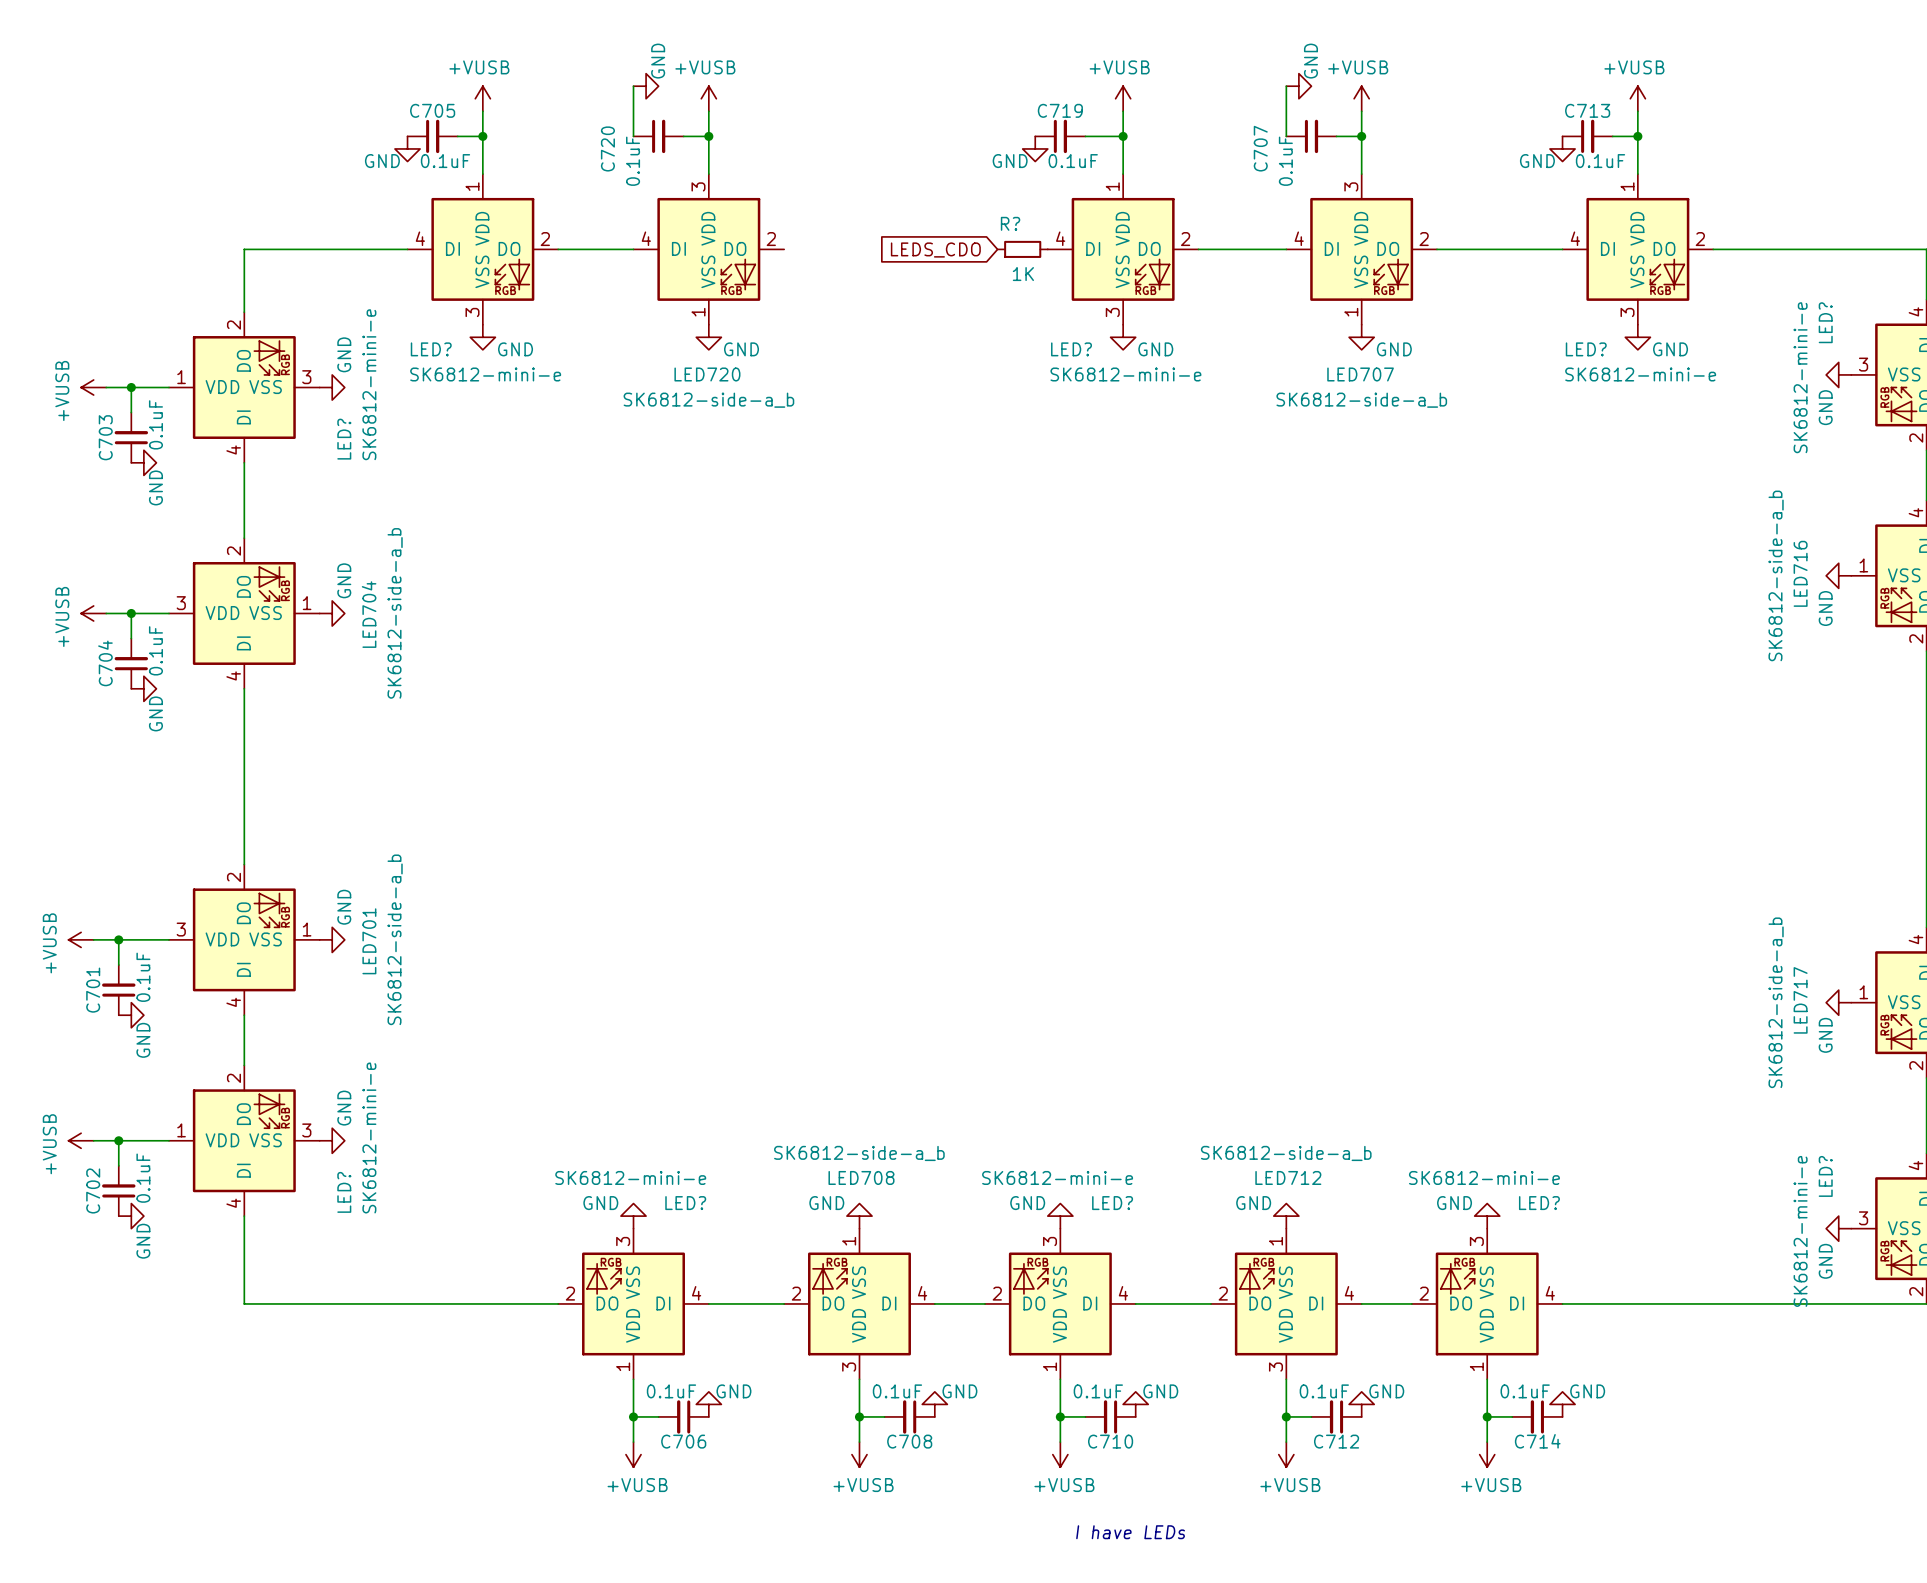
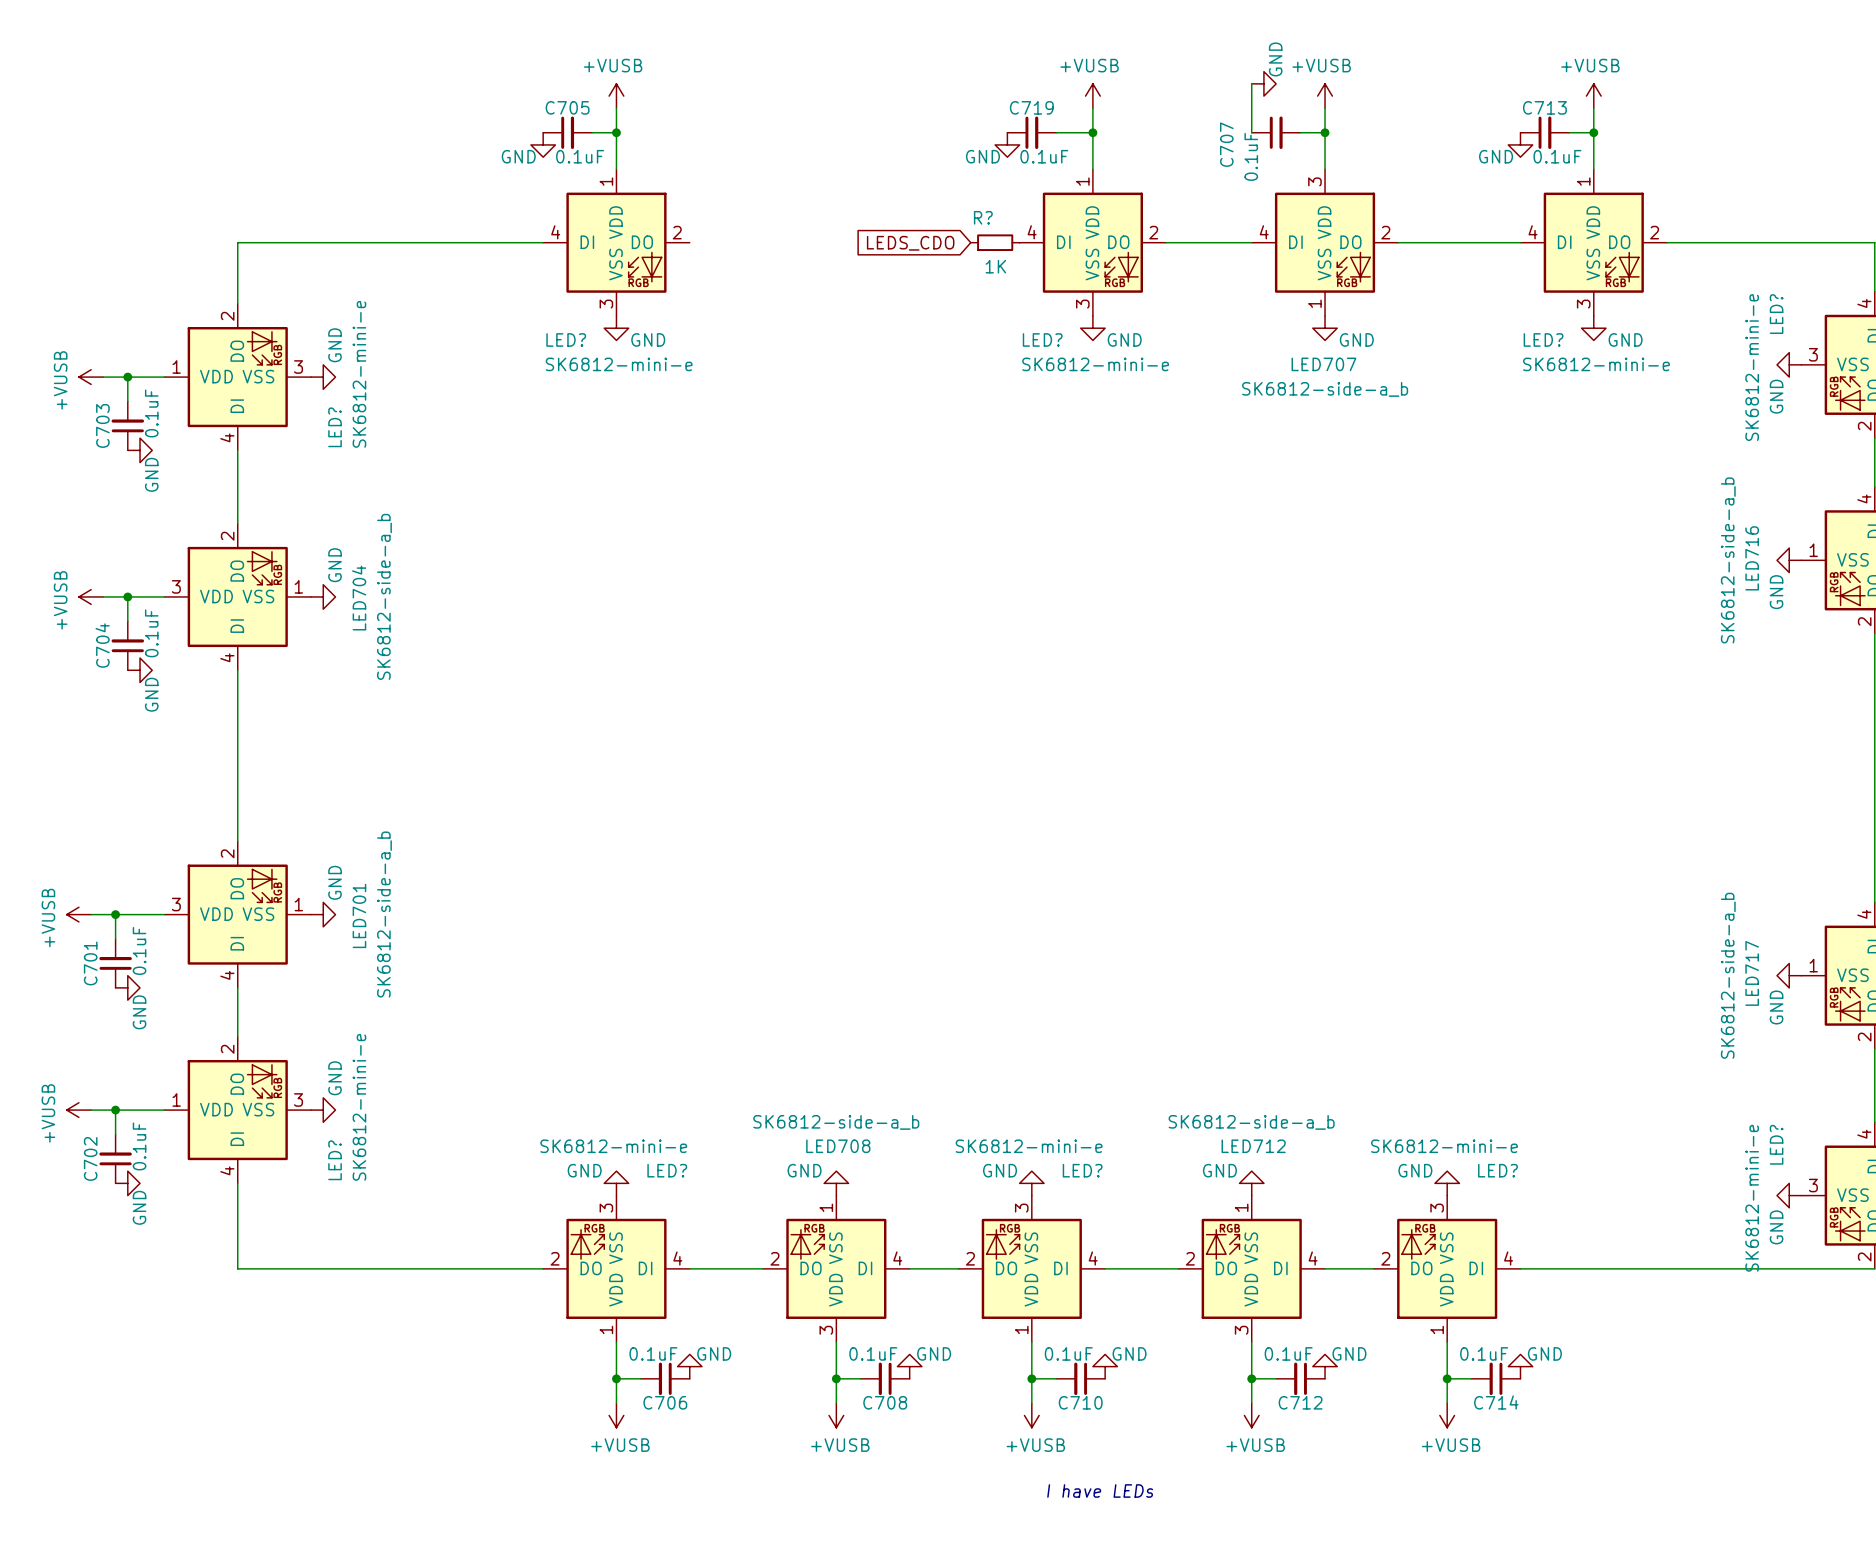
power symbol: GND (646, 86) -> none
power symbol: +VUSB (482, 98) -> none
power symbol: none -> +VUSB (616, 96)
power symbol: +VUSB (708, 98) -> none
wire: (482, 111) (482, 174) -> none
wire: (708, 111) (708, 174) -> none
C705 position: (432, 136) -> (567, 132)
wire: (457, 136) (482, 136) -> none
junction: (482, 136) -> none
wire: none -> (592, 132) (616, 132) (616, 169)
junction: none -> (616, 132)
C720: 0.1uF (658, 136) -> none
wire: (683, 136) (708, 136) -> none
junction: (708, 136) -> none
power symbol: GND (407, 148) -> none
power symbol: none -> GND (543, 144)
LED? position: (482, 249) -> (616, 242)
LED720: SK6812-side-a_b (708, 249) -> none
power symbol: GND (482, 337) -> none
power symbol: none -> GND (616, 328)
power symbol: GND (708, 337) -> none

